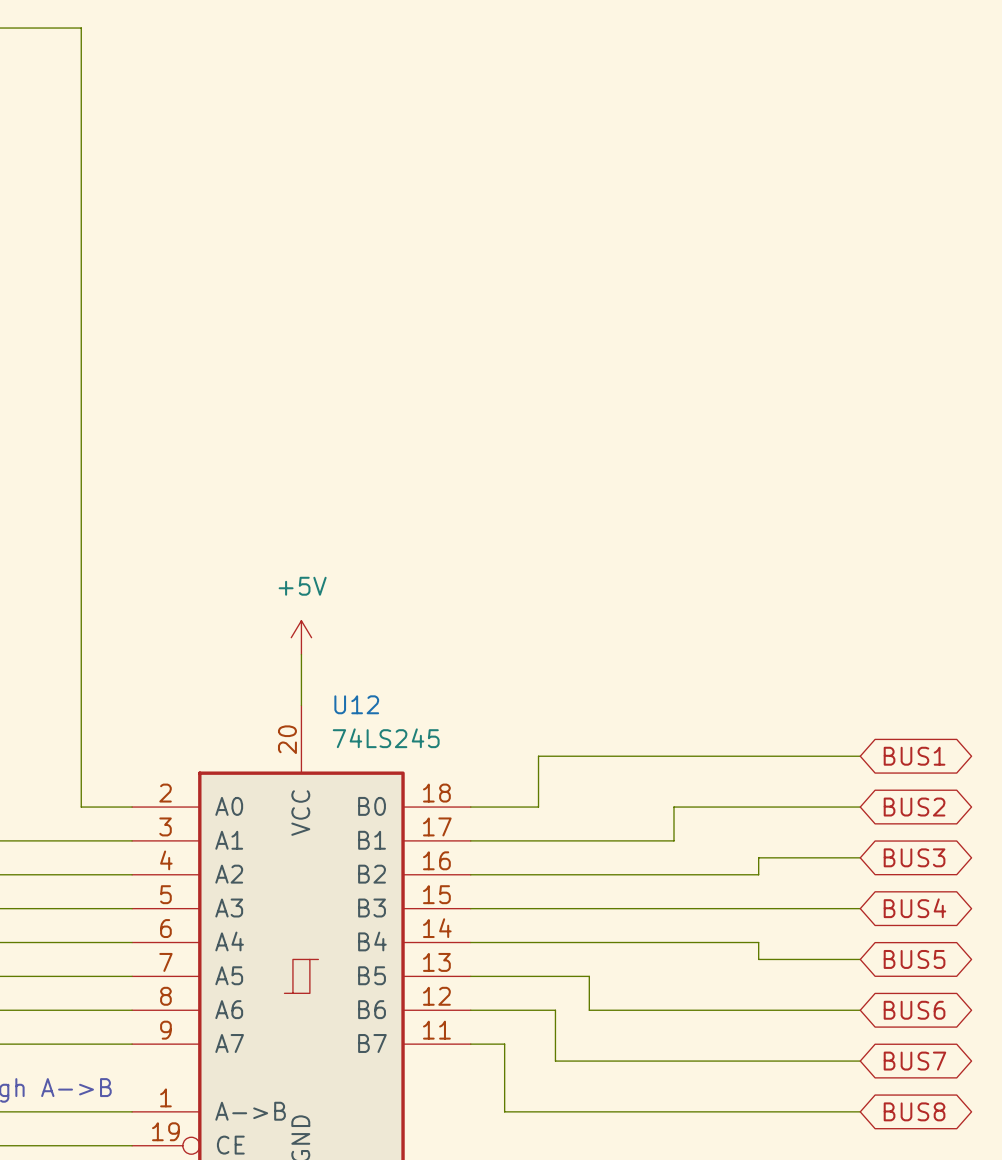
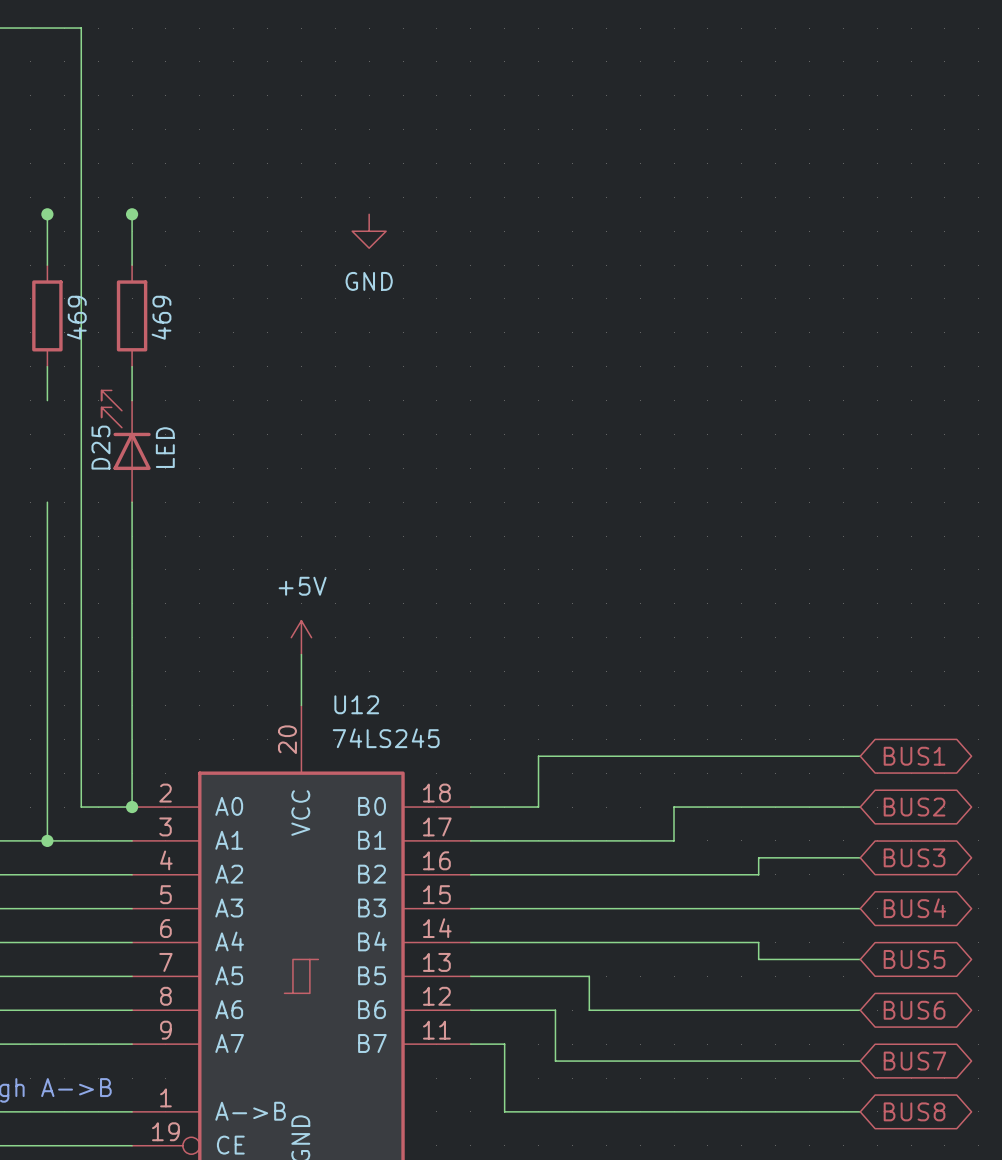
wire: none -> (47, 214) (47, 265)
junction: none -> (47, 214)
wire: none -> (132, 214) (132, 265)
junction: none -> (132, 214)
power symbol: none -> GND (369, 231)
part: none -> 469 (47, 315)
part: none -> 469 (132, 315)
wire: none -> (47, 366) (47, 400)
wire: none -> (132, 366) (132, 400)
D25: none -> LED (126, 446)
wire: none -> (47, 502) (47, 840)
wire: none -> (132, 502) (132, 807)
junction: none -> (132, 807)
junction: none -> (47, 840)

